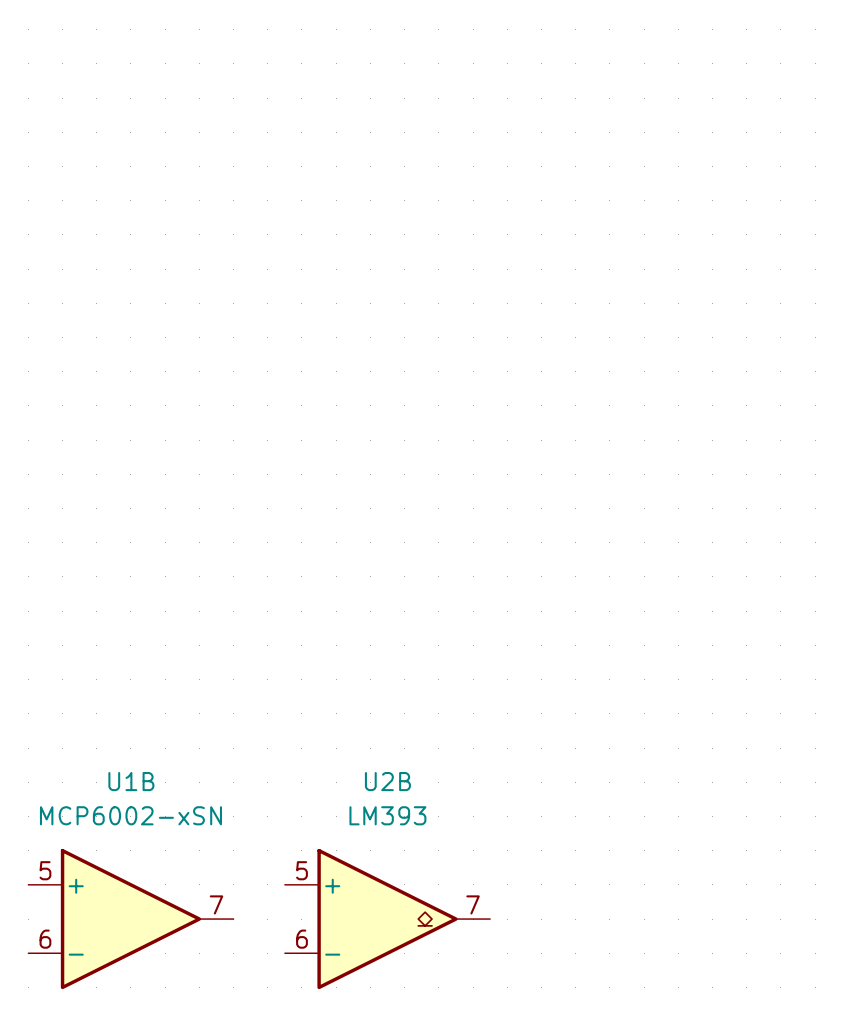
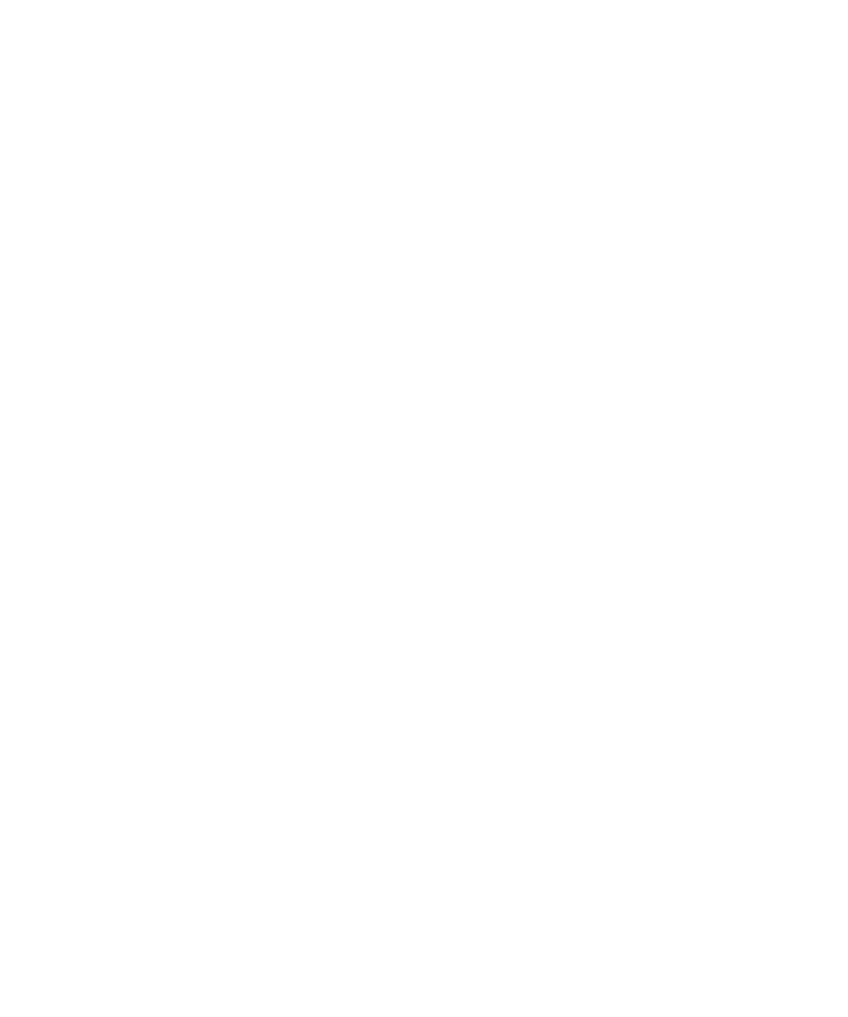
U1B: MCP6002-xSN (130, 919) -> none
U2B: LM393 (387, 919) -> none

